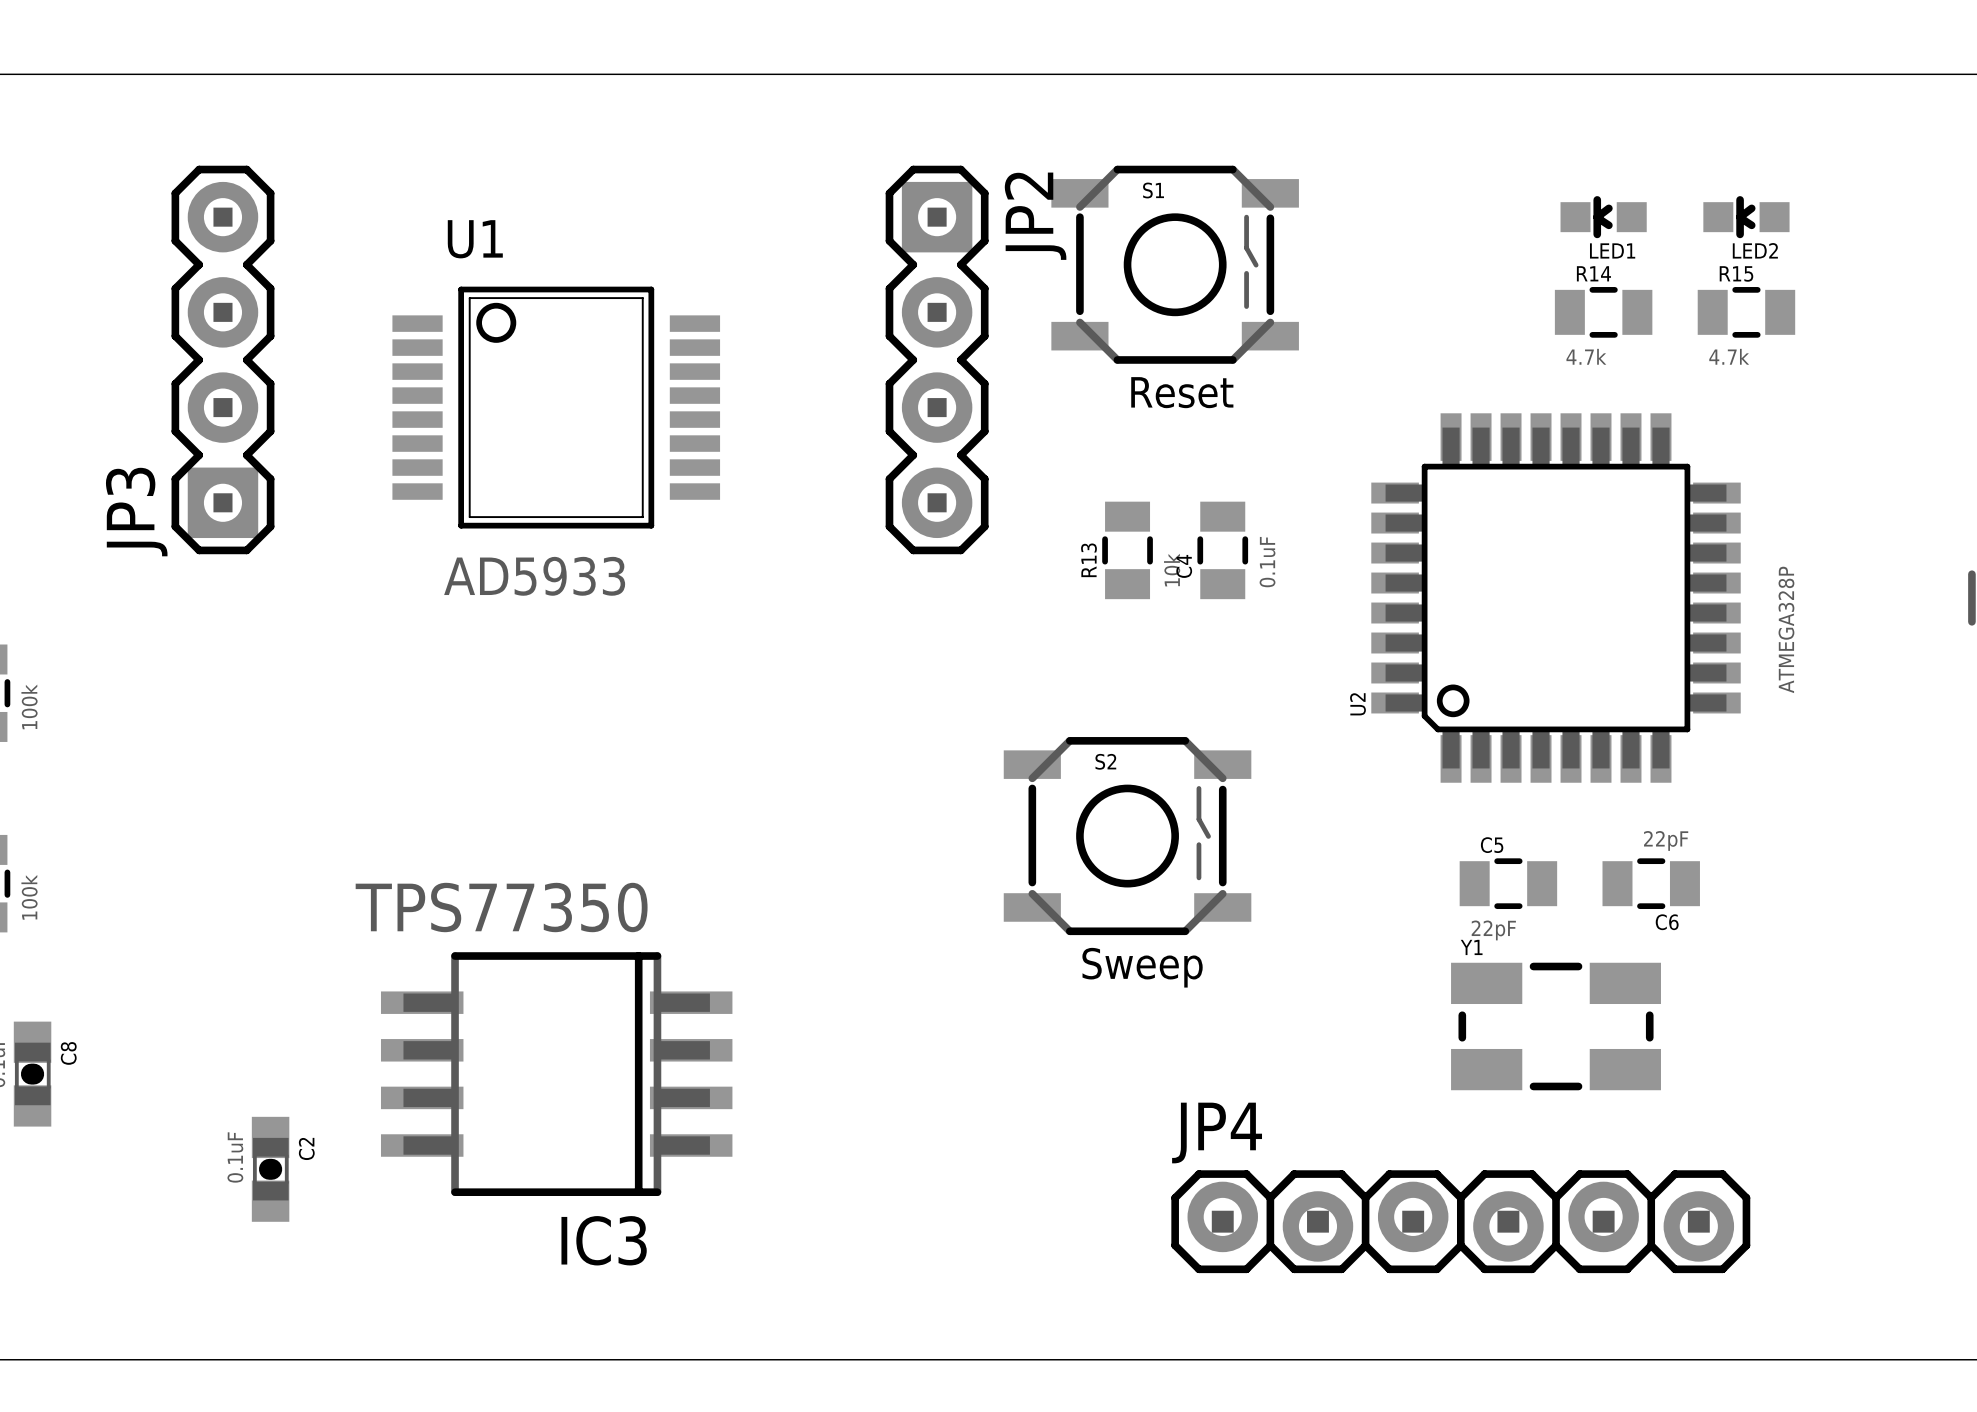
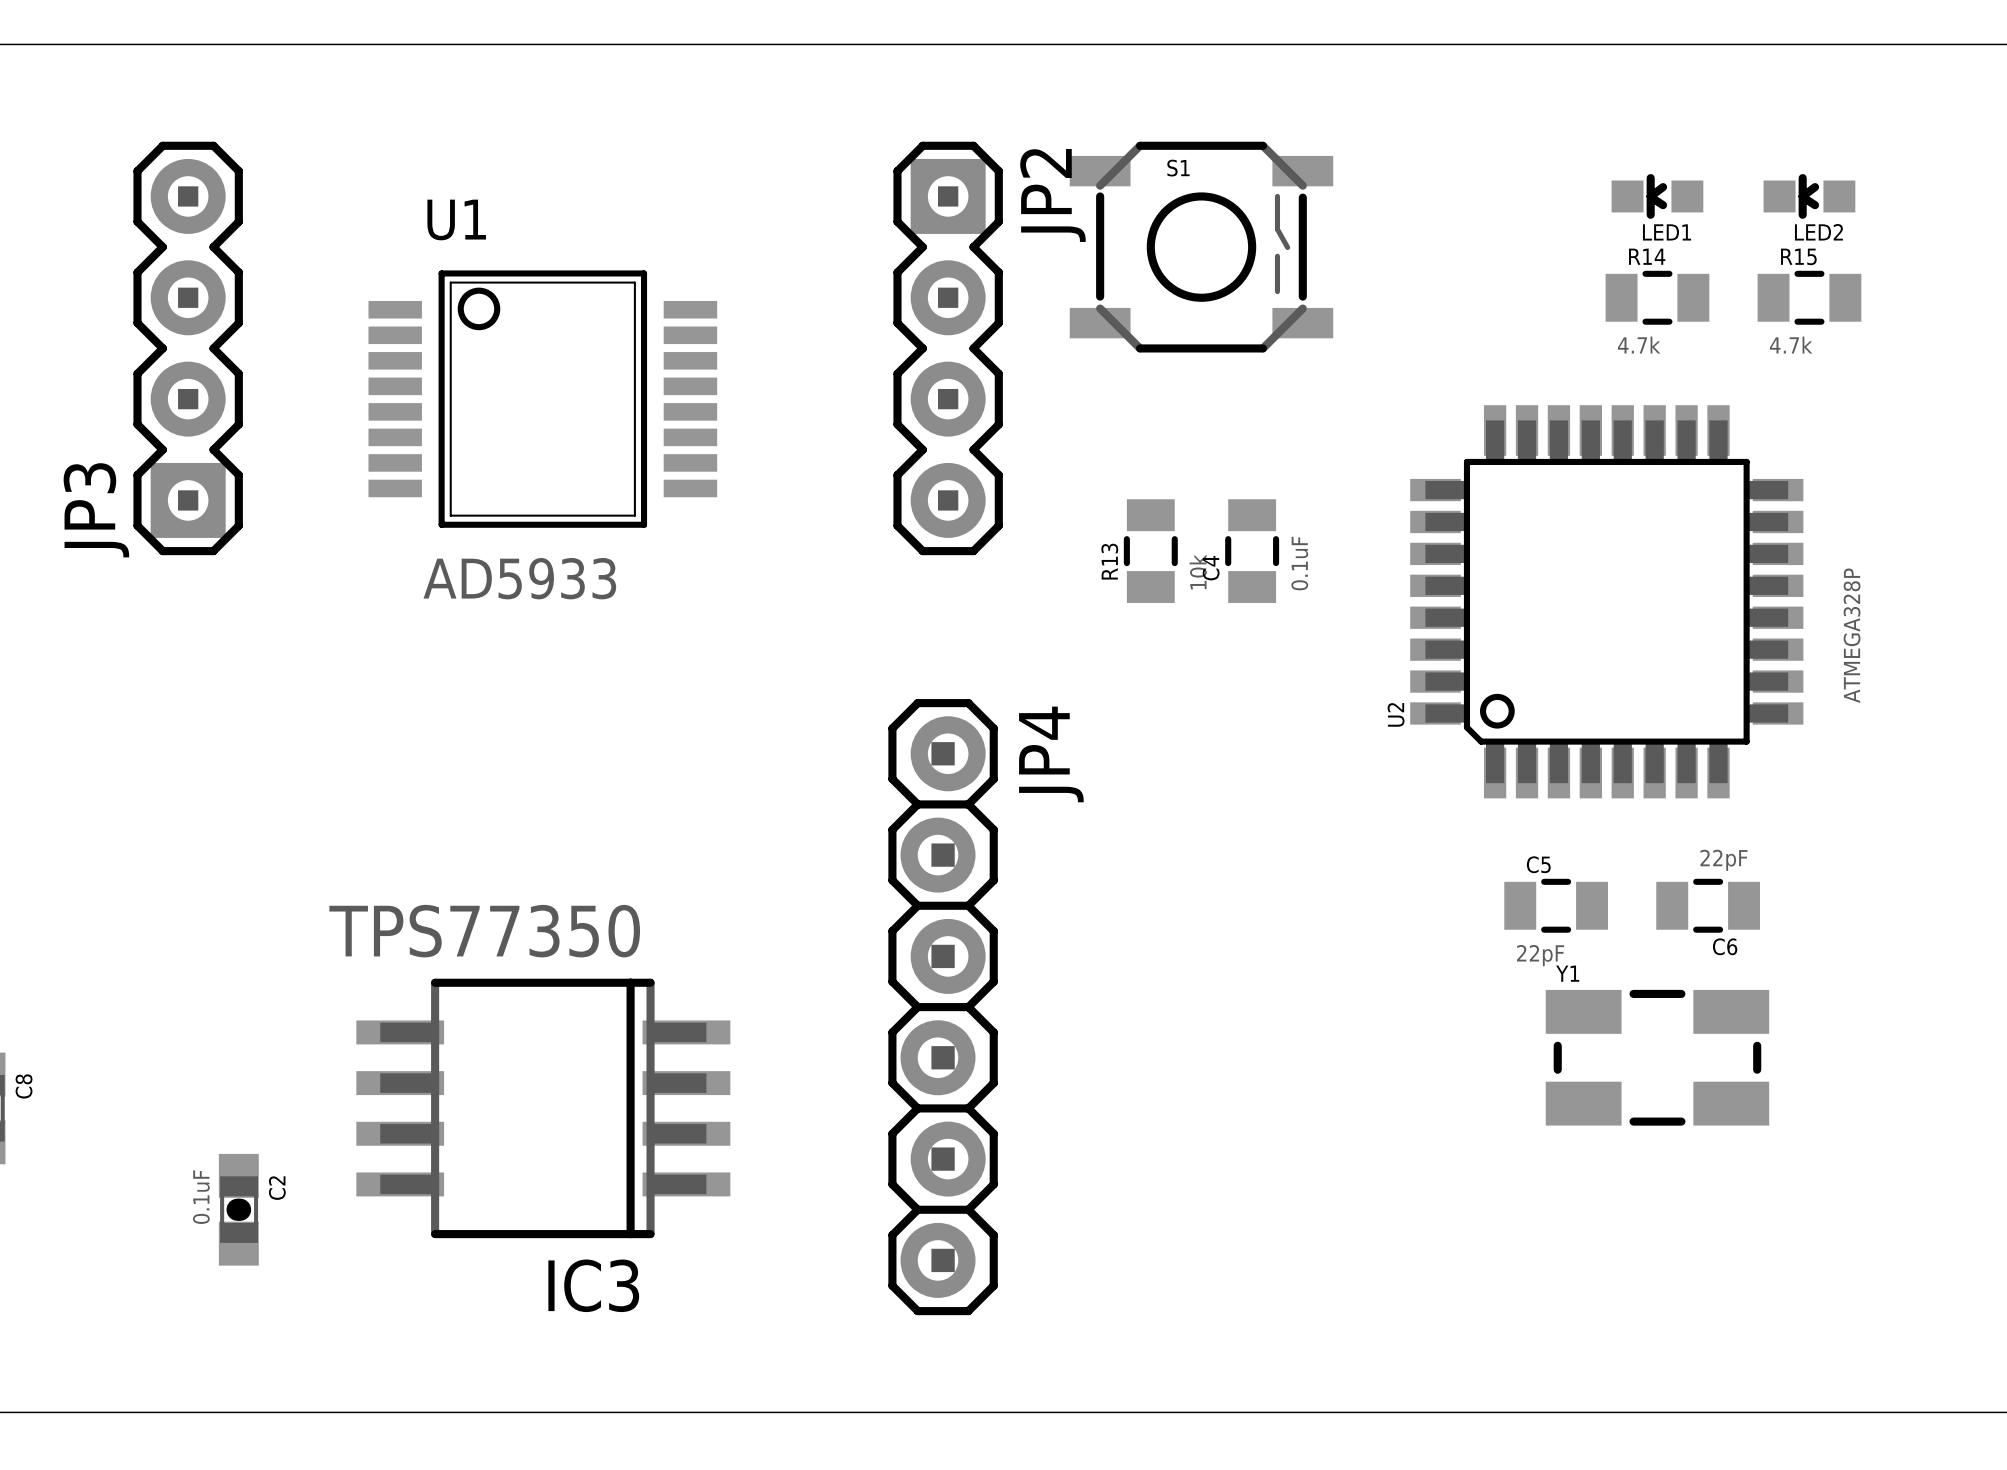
text: Reset (1182, 392) -> none
S2: (1127, 836) -> none
text: Sweep (1142, 967) -> none
Y1 position: (1556, 1026) -> (1657, 1057)
JP4 rotation: 0° (1460, 1221) -> 90° clockwise (943, 1007)
JP4 position: (1460, 1221) -> (943, 1007)

